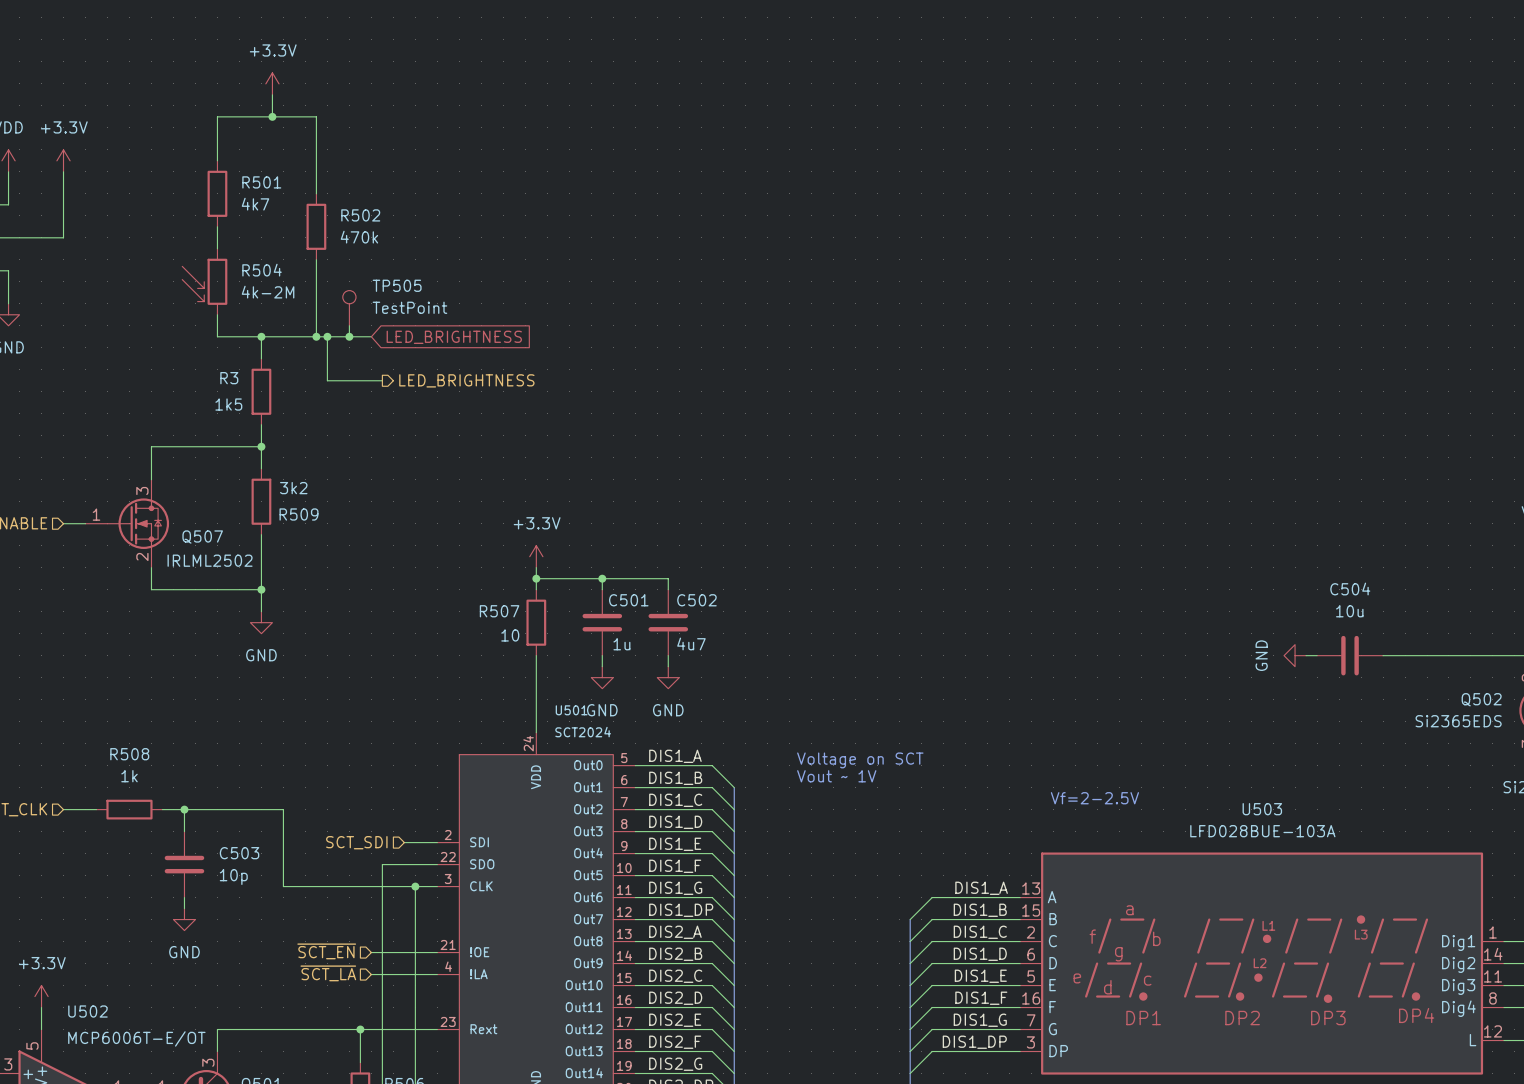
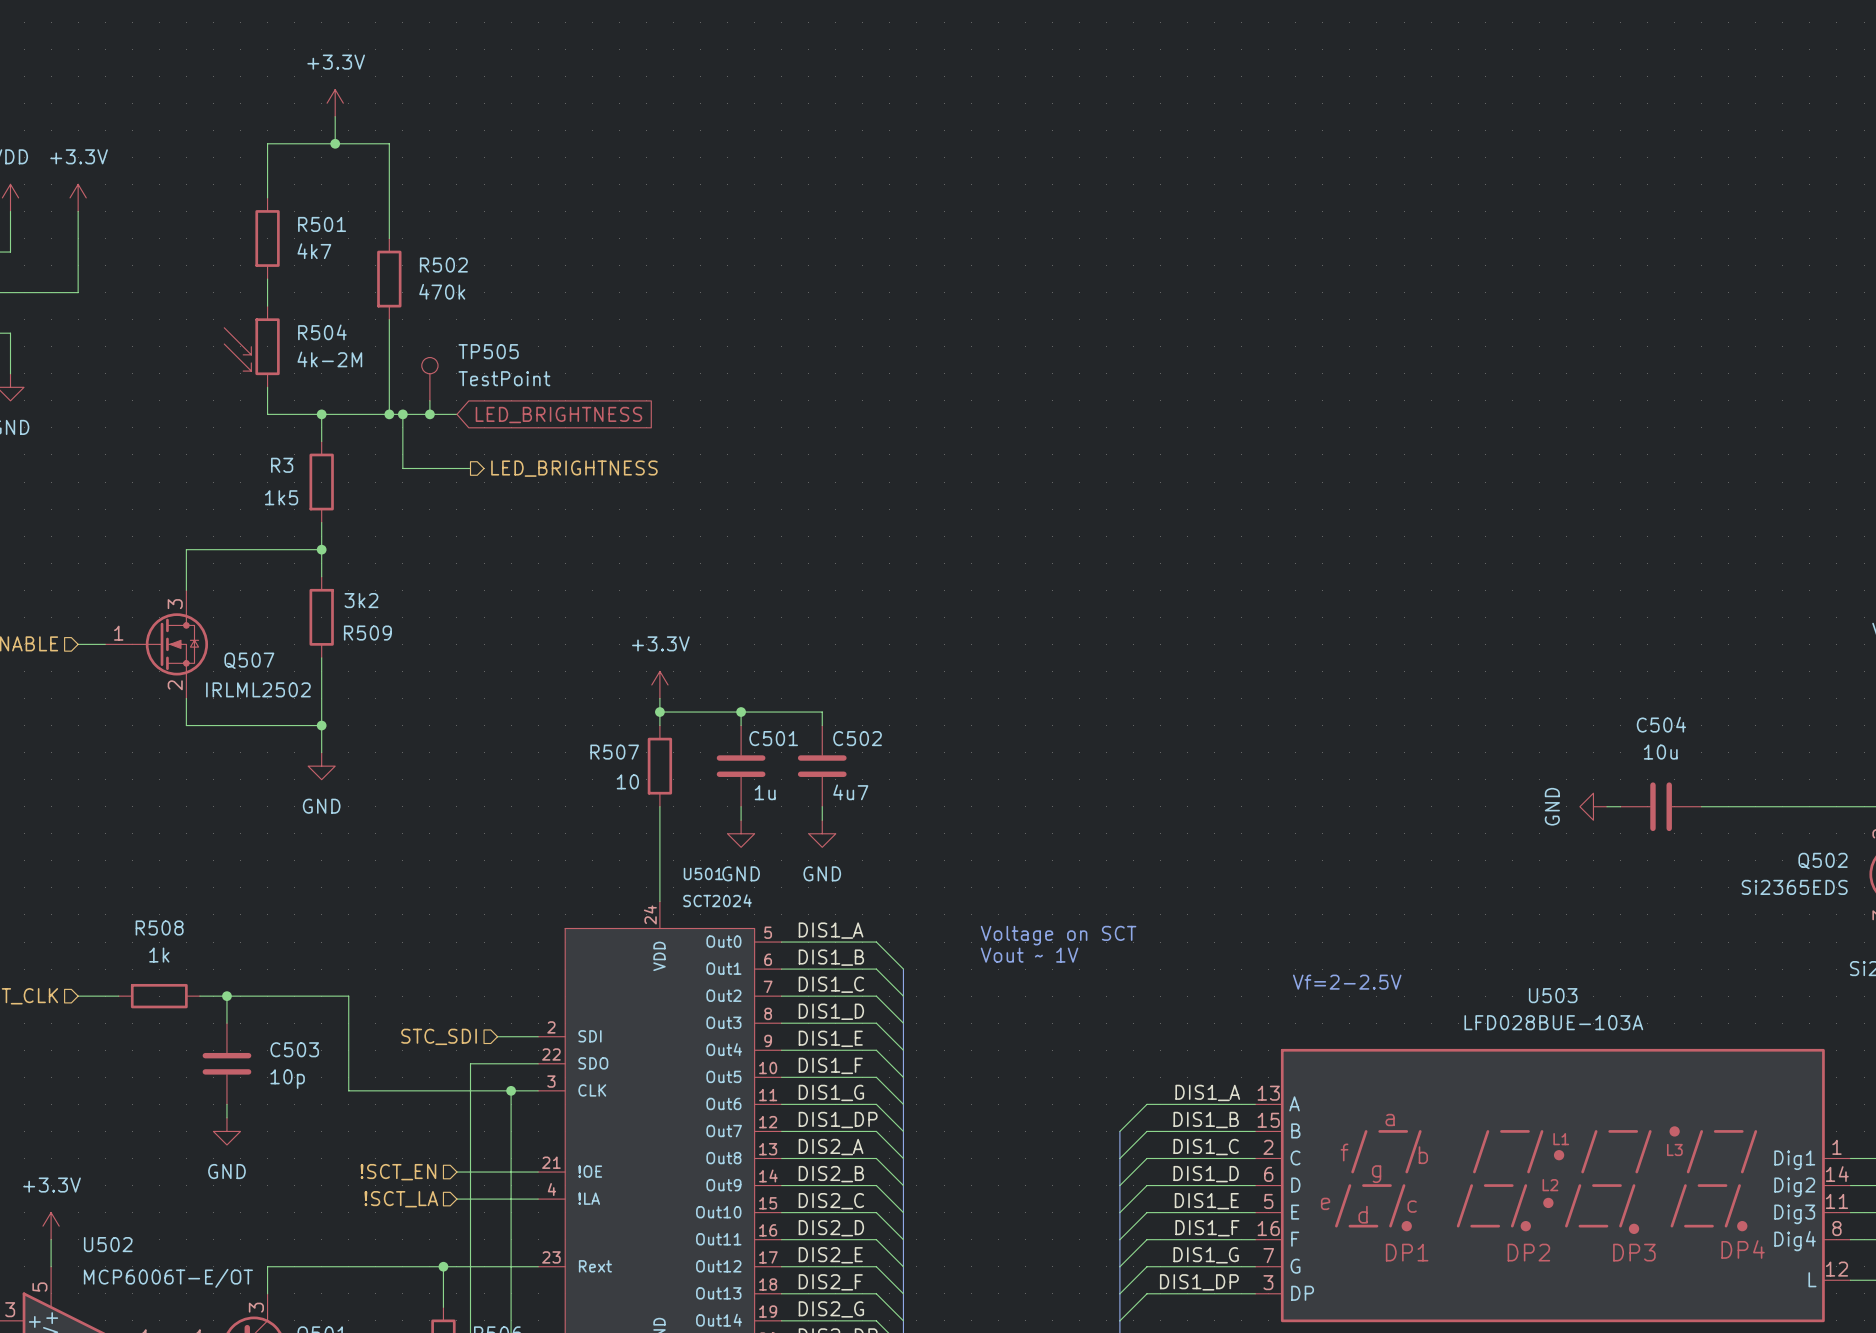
hierarchical label: SCT_SDI (356, 842) -> STC_SDI (439, 1036)
hierarchical label: ~{SCT_EN} (326, 951) -> !SCT_EN (398, 1172)
hierarchical label: ~{SCT_LA} (328, 973) -> !SCT_LA (401, 1199)

